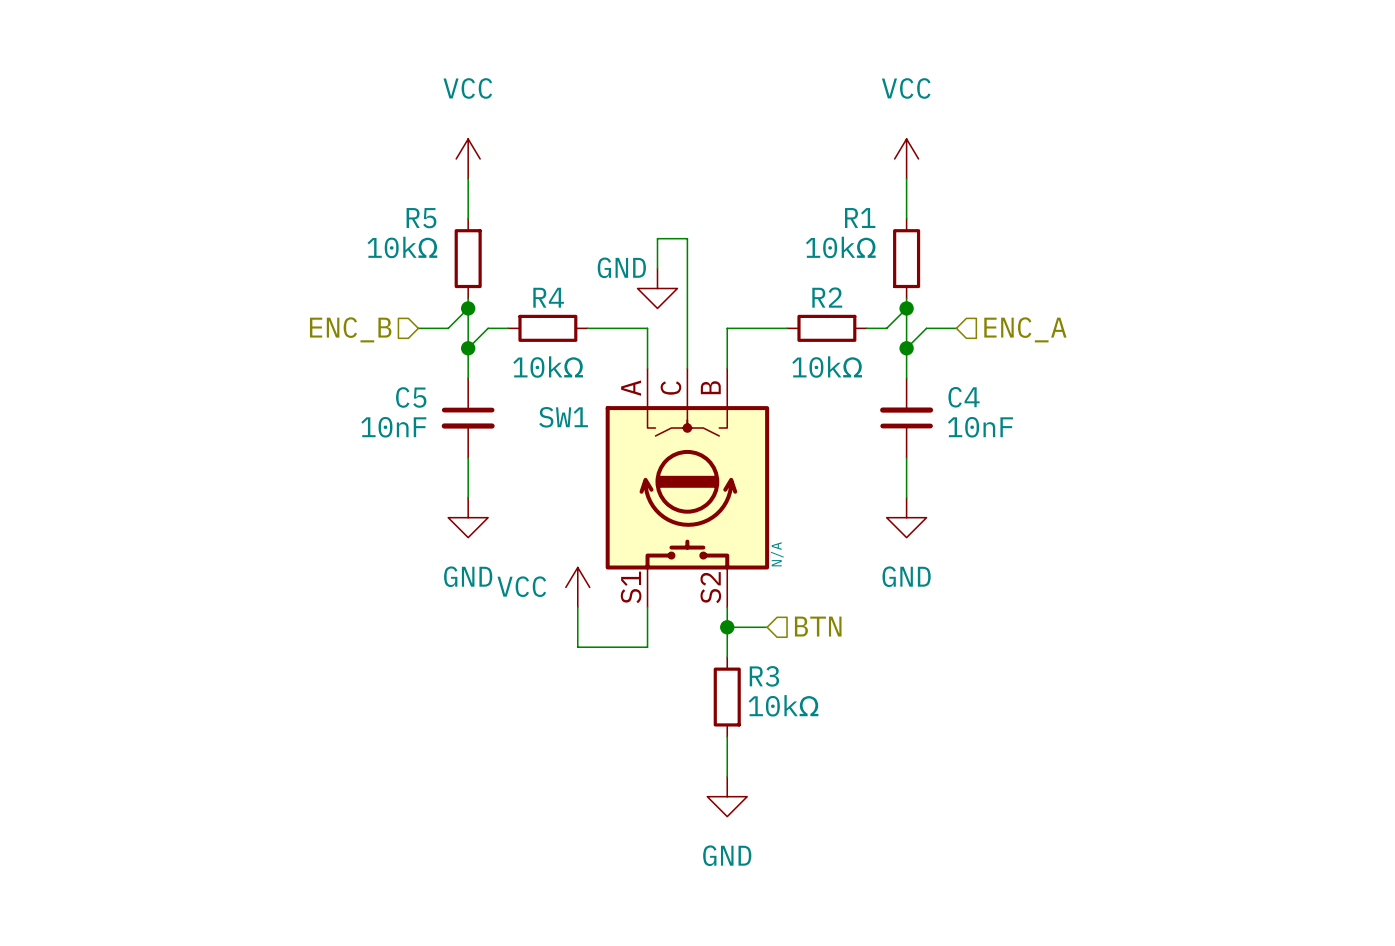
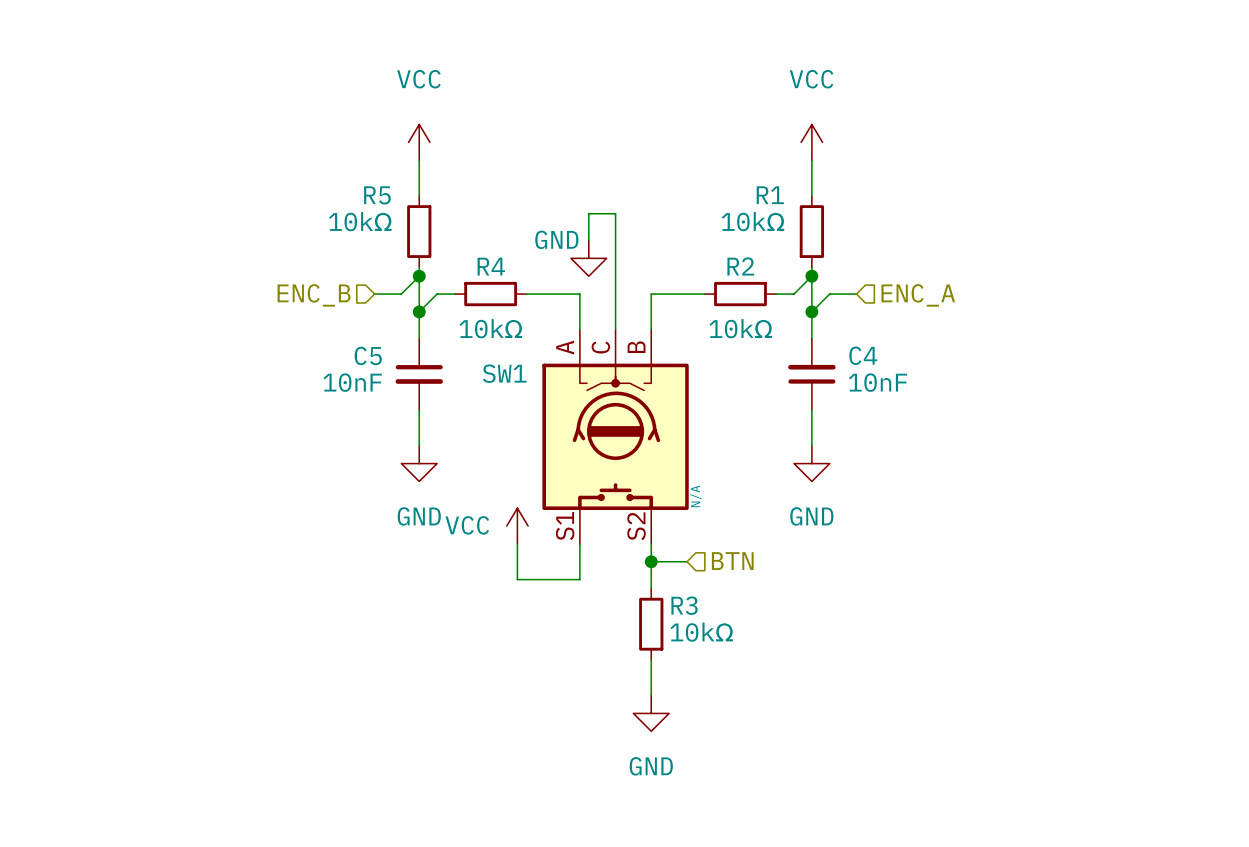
SW1 symbol: [605, 368, 770, 608] -> [542, 329, 689, 544]

